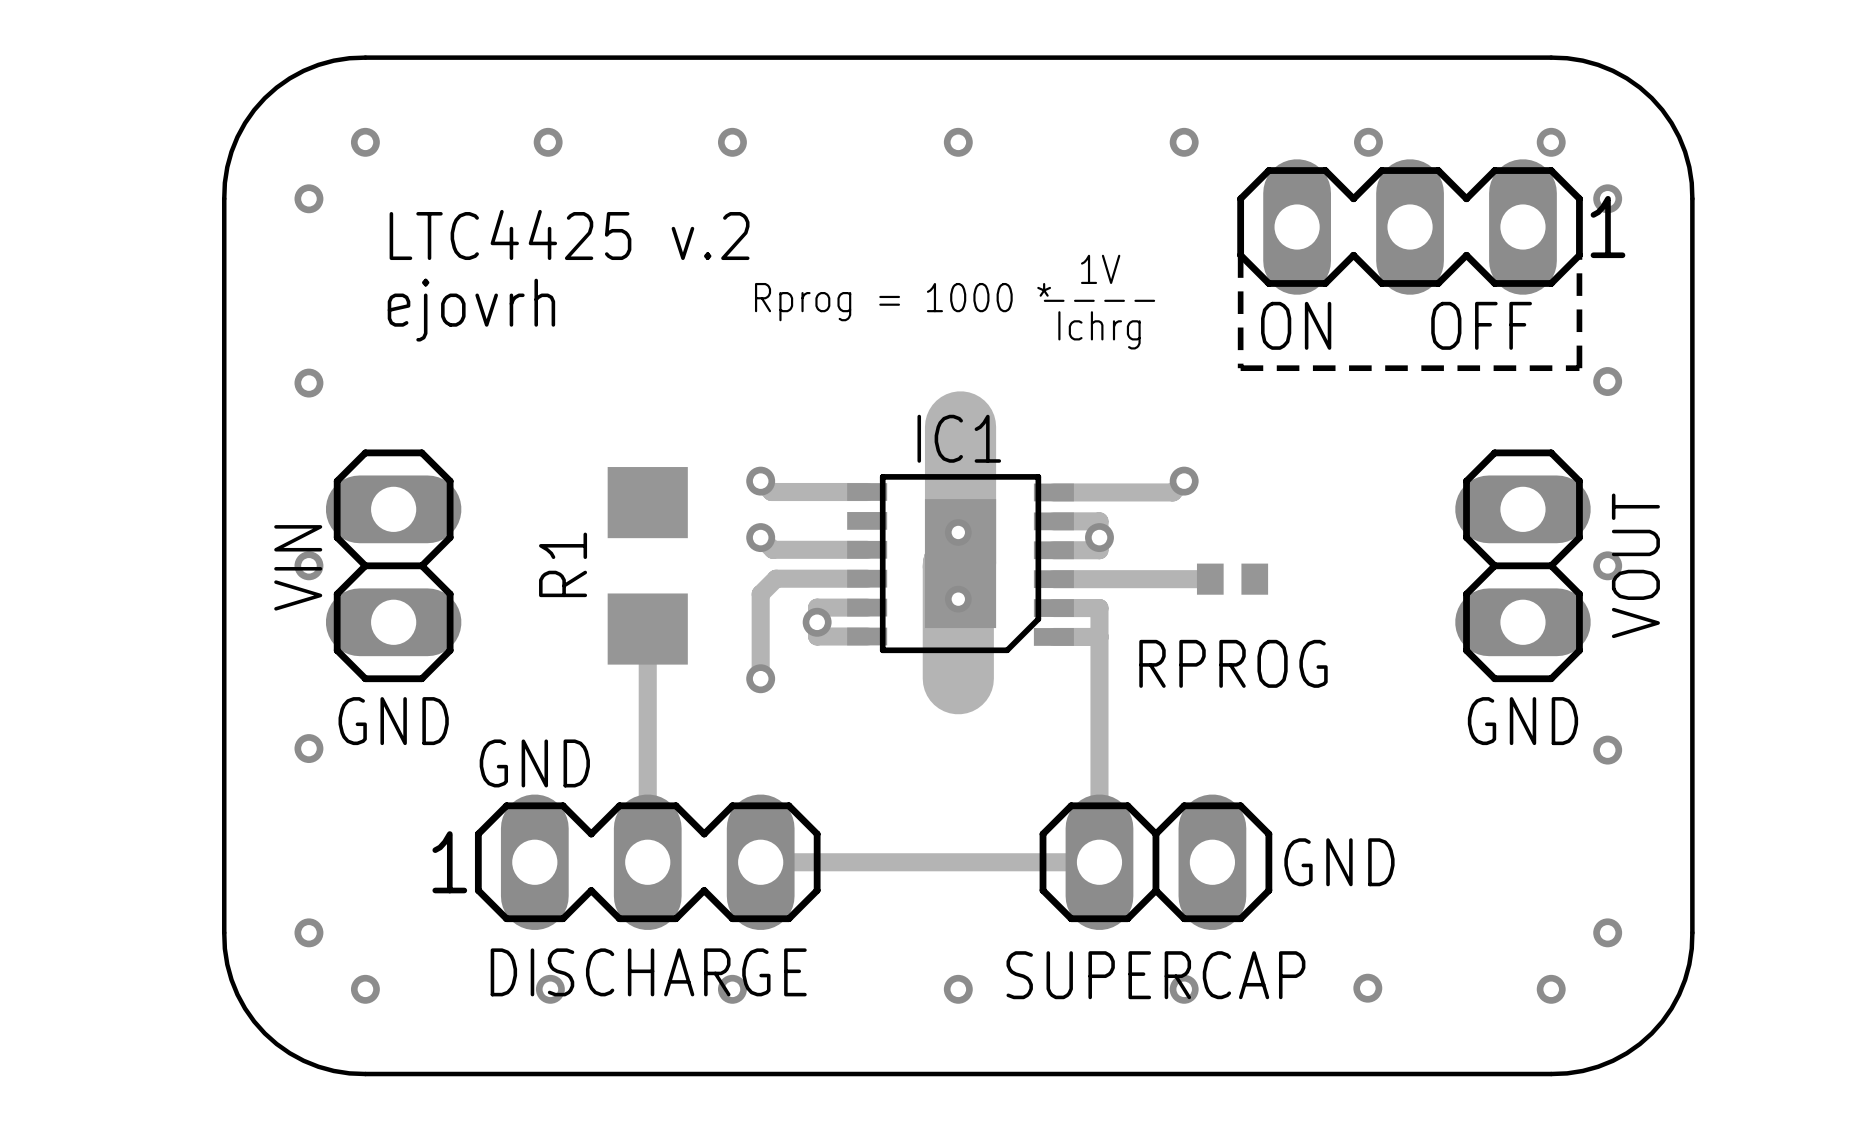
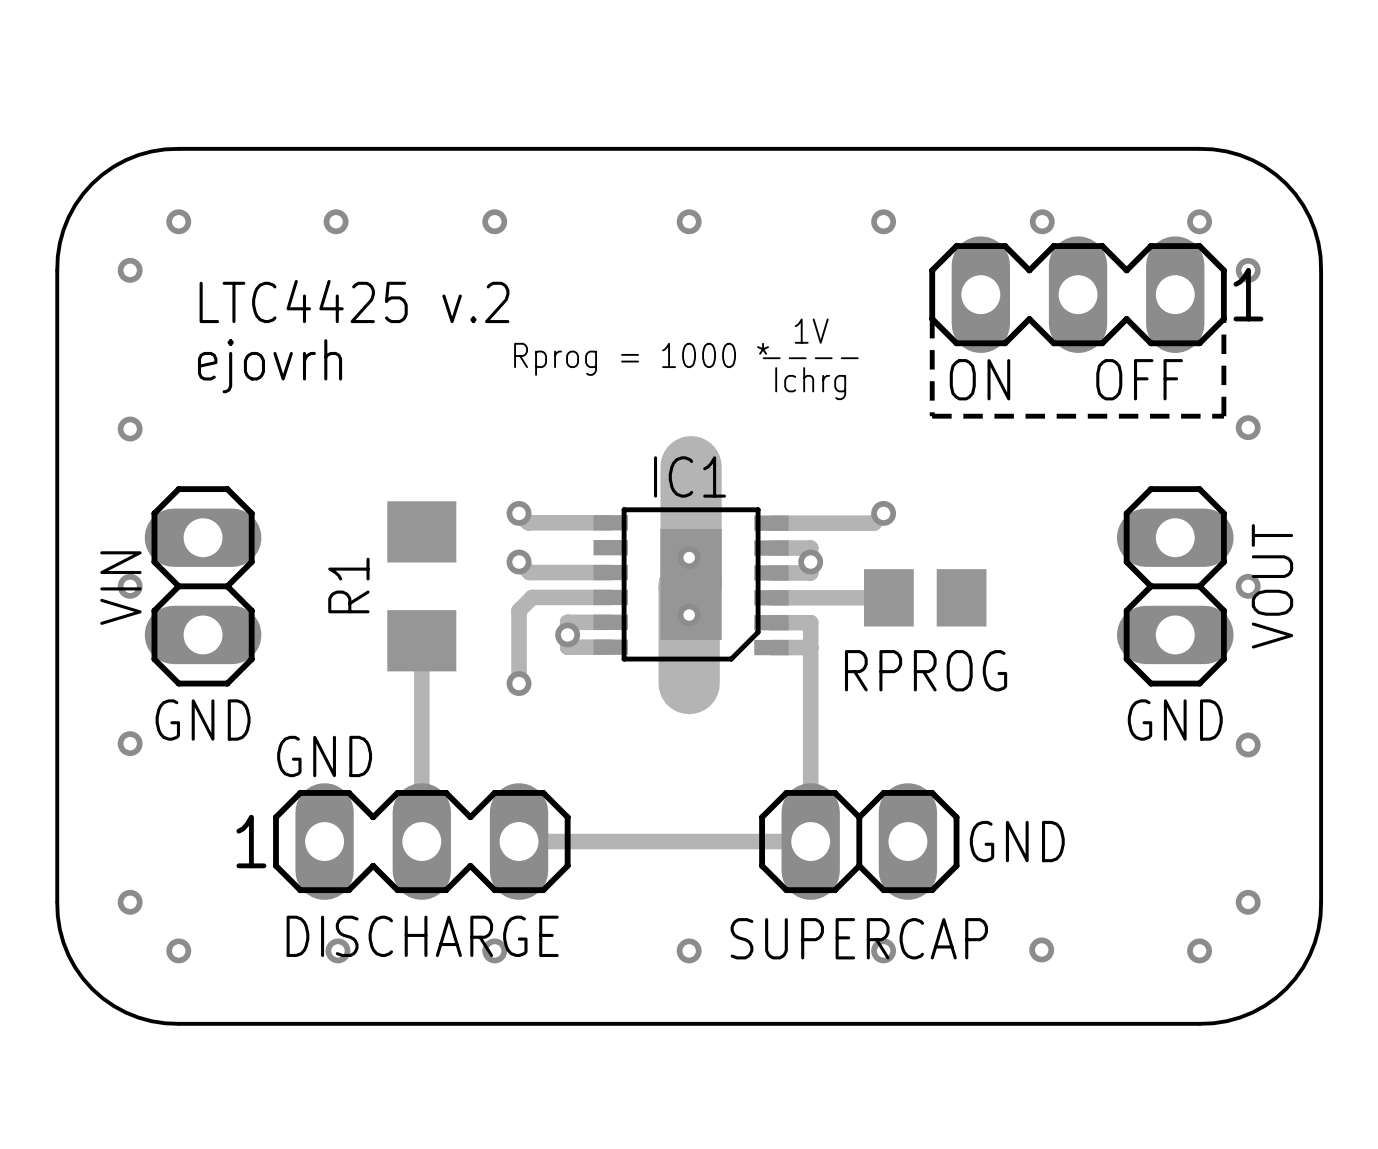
RPROG footprint: [1196, 563, 1269, 595] -> [863, 569, 987, 627]

